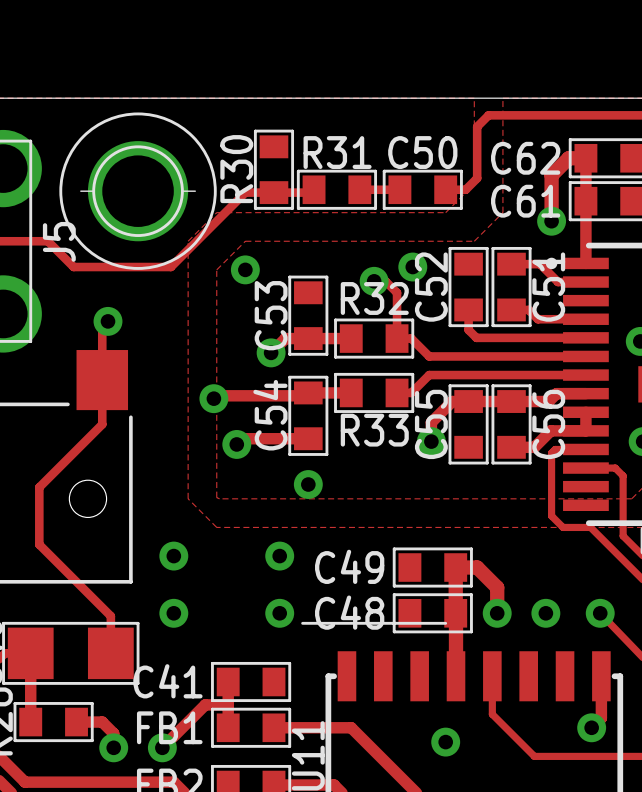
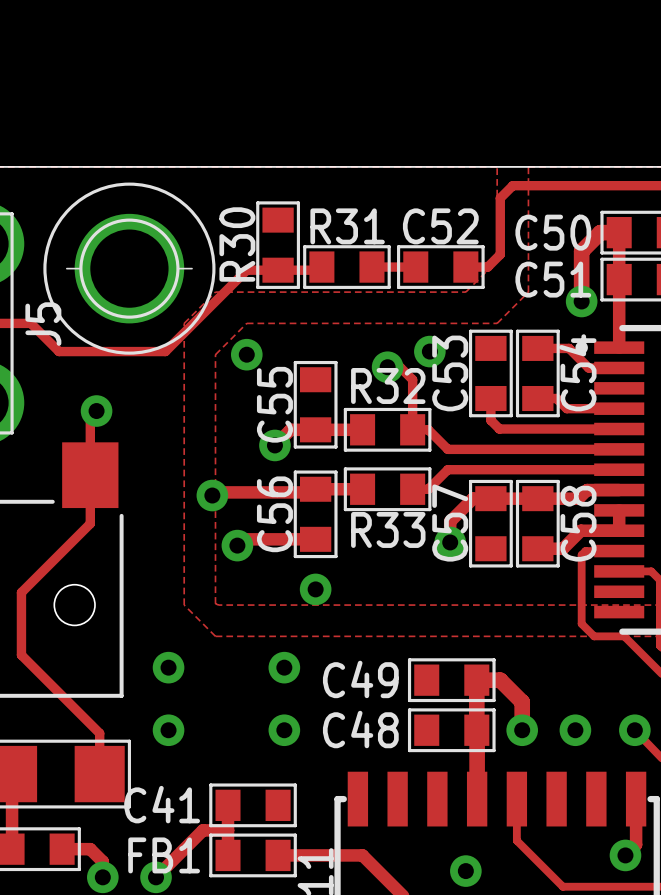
C50 name: C50 (422, 152) -> C52 (440, 226)
C62 name: C62 (525, 158) -> C50 (553, 232)
C61 name: C61 (525, 201) -> C51 (553, 279)
C52 name: C52 (431, 287) -> C53 (450, 373)
C51 name: C51 (548, 287) -> C54 (577, 372)
C53 name: C53 (271, 315) -> C55 (274, 404)
C54 name: C54 (270, 415) -> C56 (274, 514)
C55 name: C55 (431, 424) -> C57 (450, 523)
C56 name: C56 (548, 424) -> C58 (578, 523)
line: (302, 623) (445, 623) -> none

